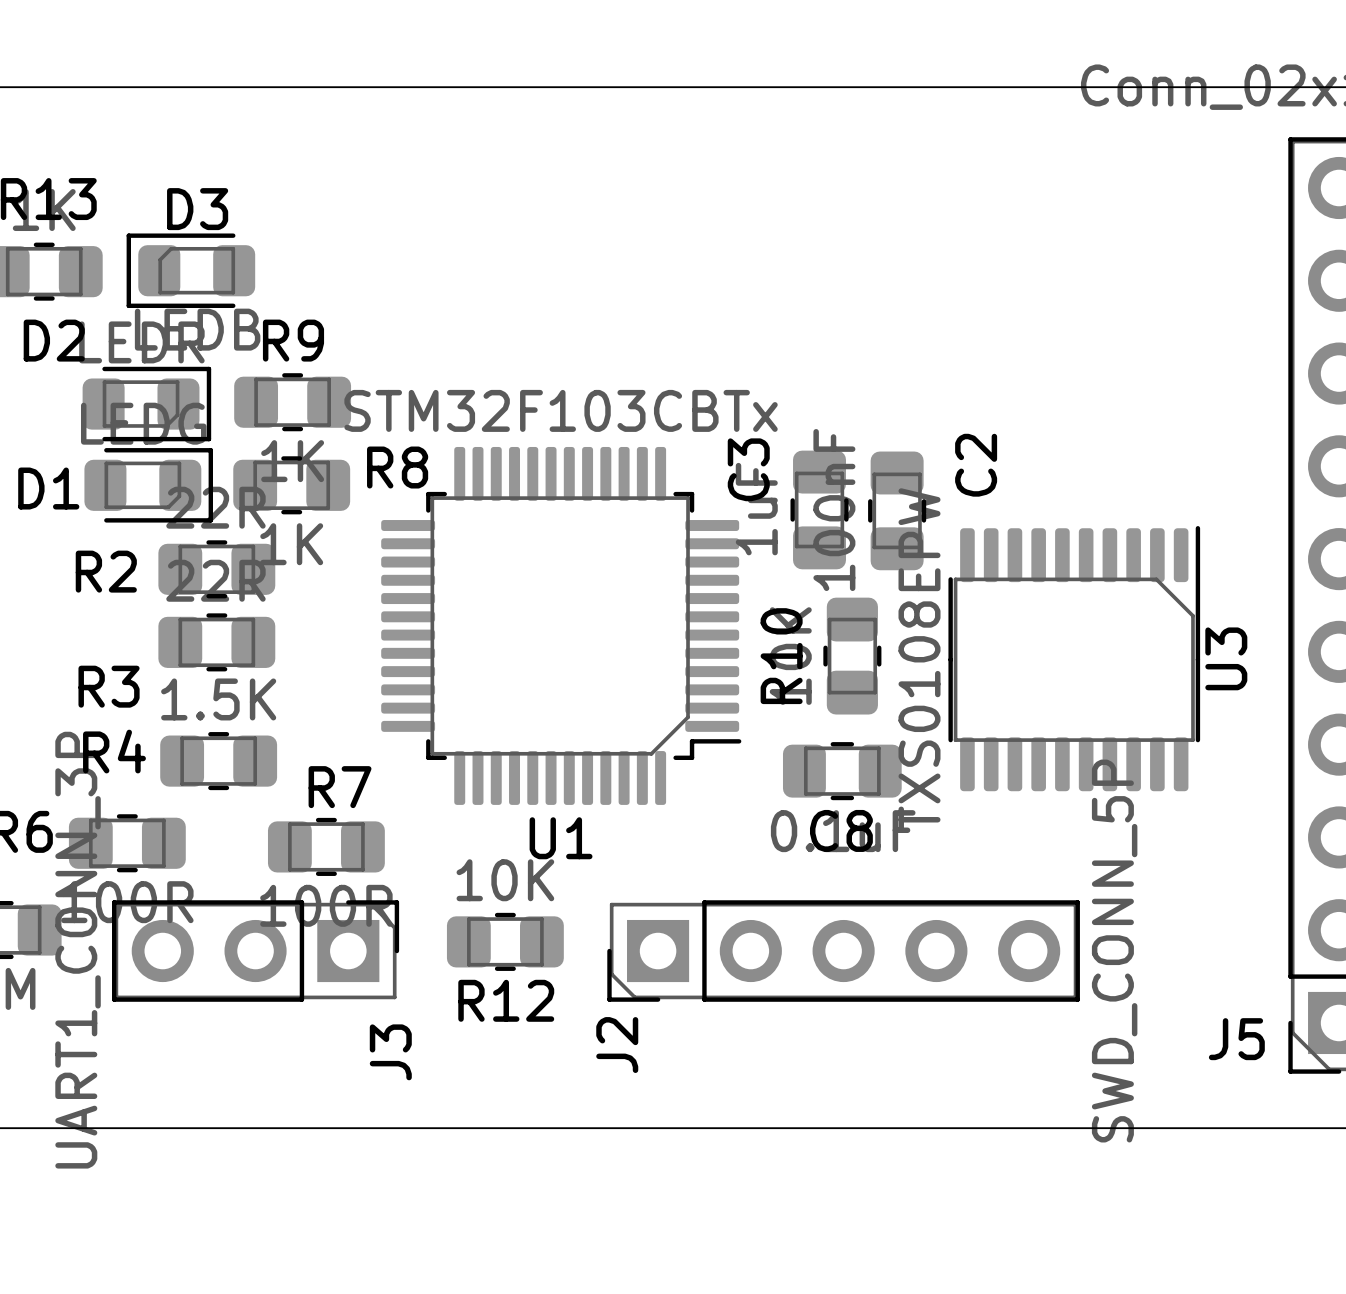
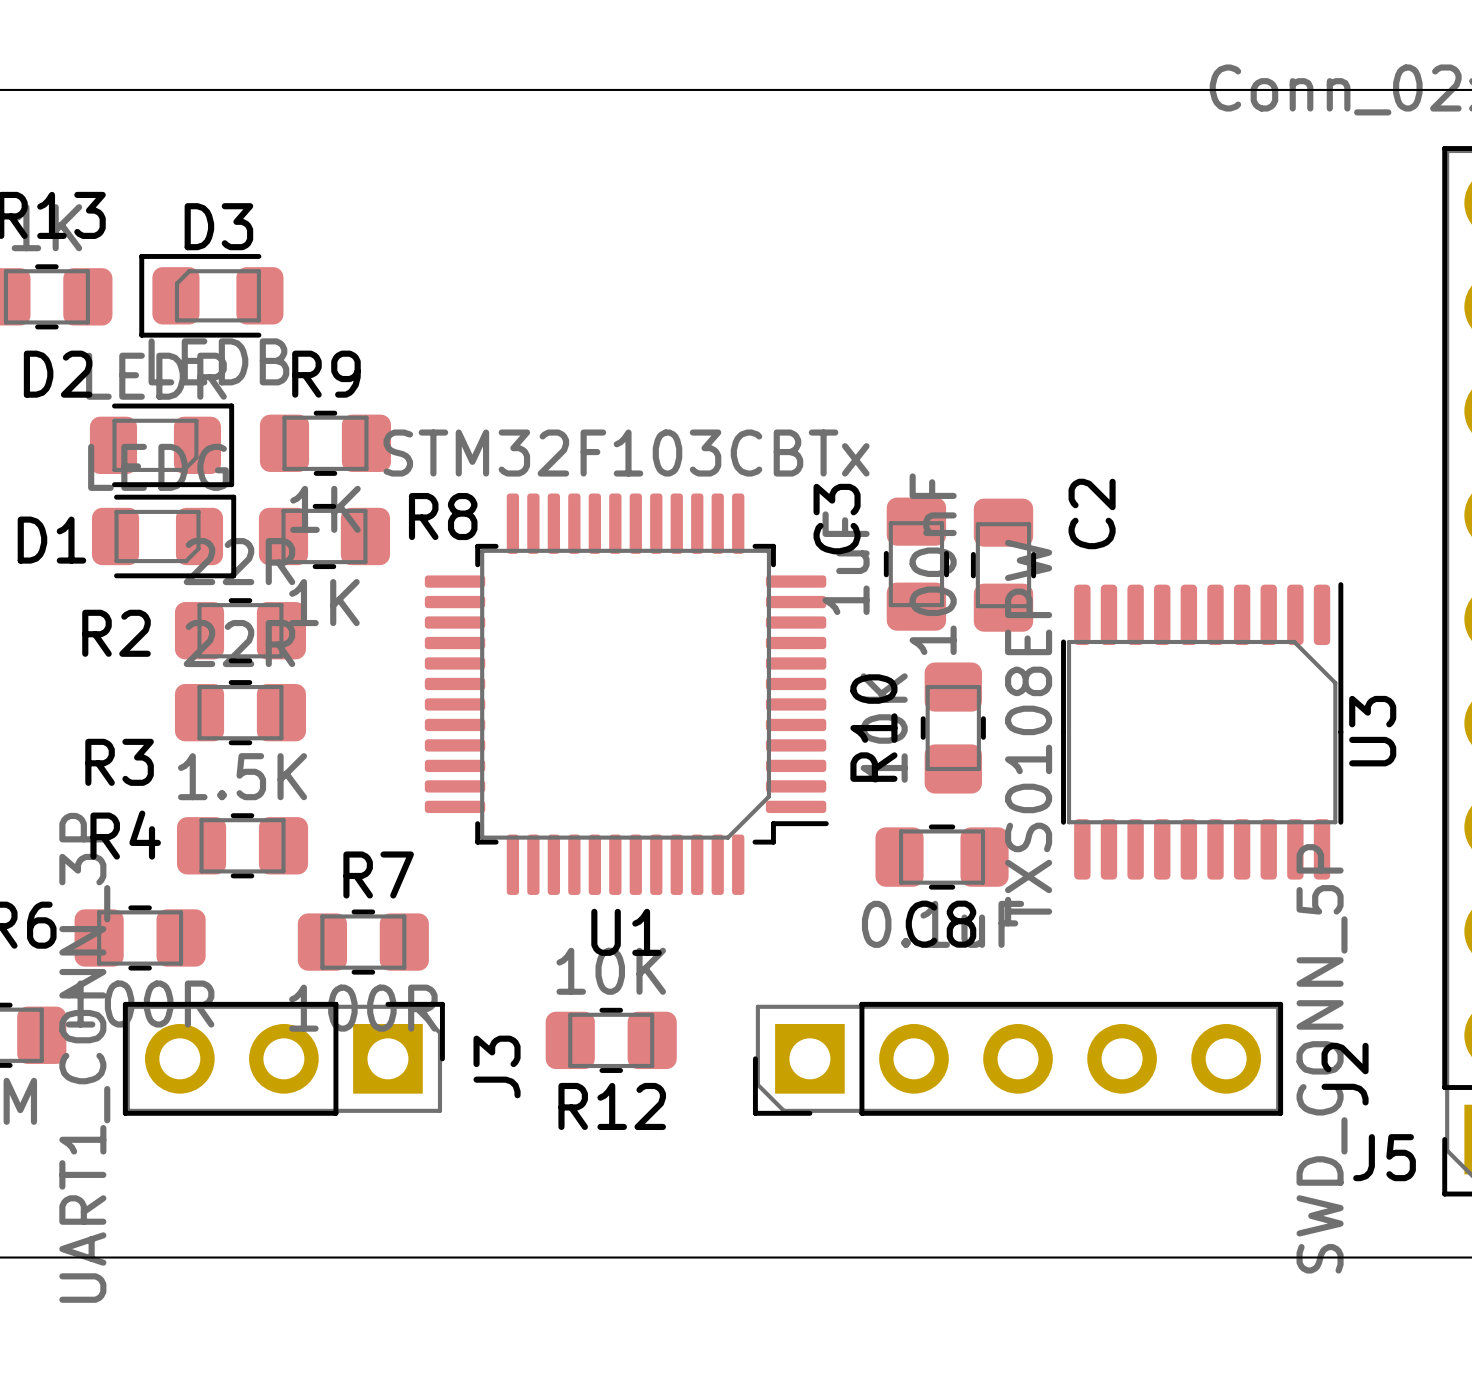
R12 position: (505, 941) -> (611, 1040)
J2 position: (843, 951) -> (1018, 1058)
J2 name position: J2 (617, 1045) -> J2 (1345, 1074)
J3 name position: J3 (390, 1052) -> J3 (497, 1066)

